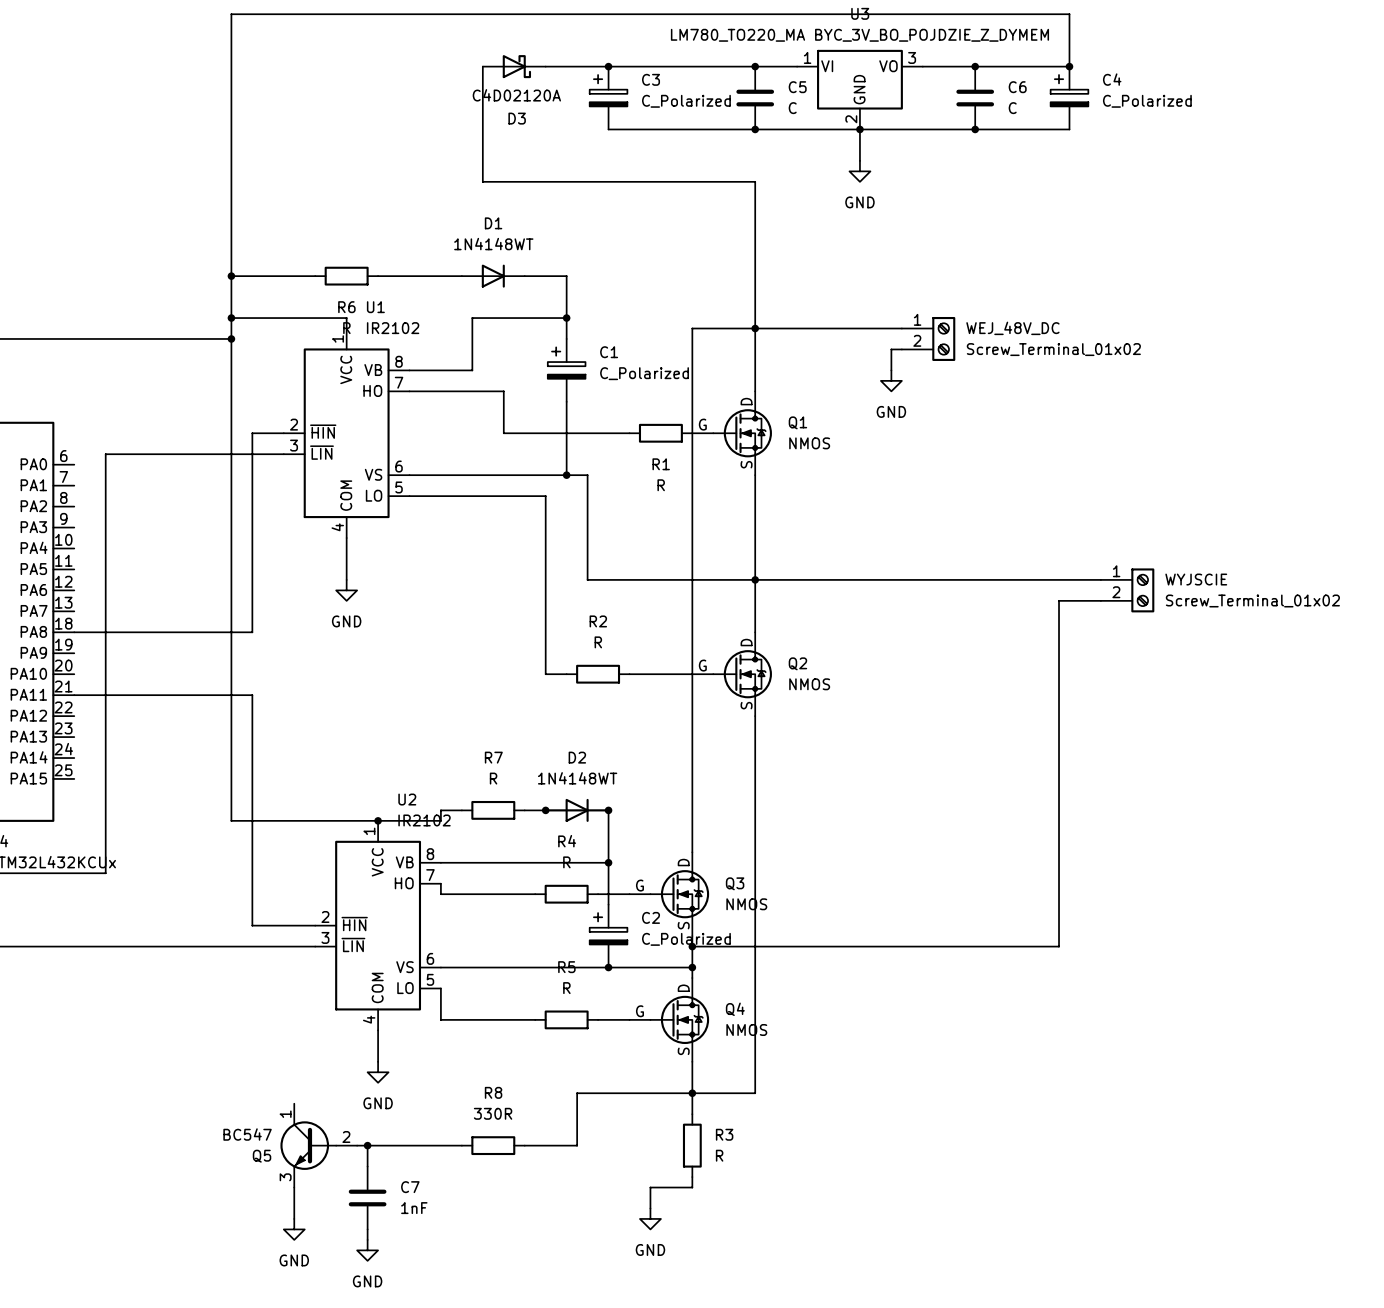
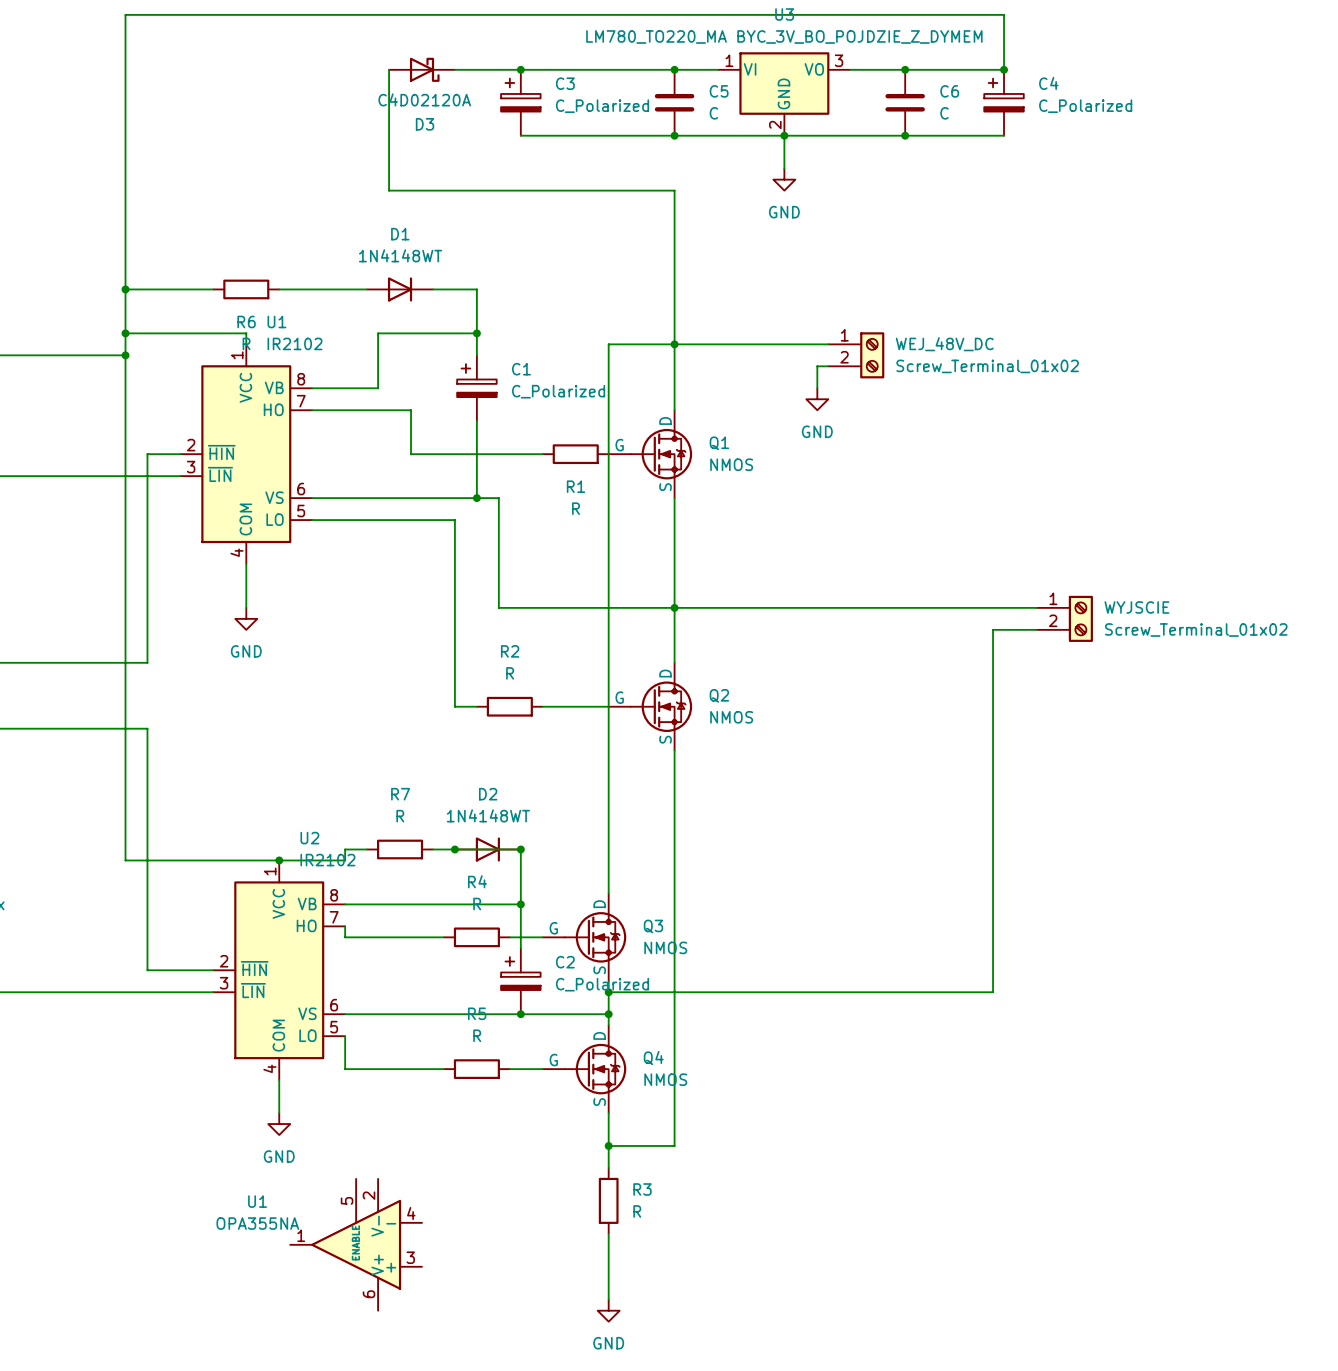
wire: (692, 1093) (577, 1093) (577, 1145) (524, 1145) -> none
Q5: BC547 (318, 1145) -> none
wire: (357, 1145) (461, 1145) -> none
wire: (367, 1145) (367, 1166) -> none
junction: (367, 1145) -> none
R8: 330R (493, 1145) -> none
wire: (294, 1187) (294, 1218) -> none
U1: none -> OPA355NA (356, 1244)
wire: (692, 1187) (650, 1187) (650, 1208) -> (608, 1244) (608, 1299)
C7: 1nF (367, 1198) -> none
power symbol position: GND (650, 1218) -> GND (608, 1310)
power symbol: GND (294, 1229) -> none
wire: (367, 1229) (367, 1239) -> none
power symbol: GND (367, 1250) -> none

